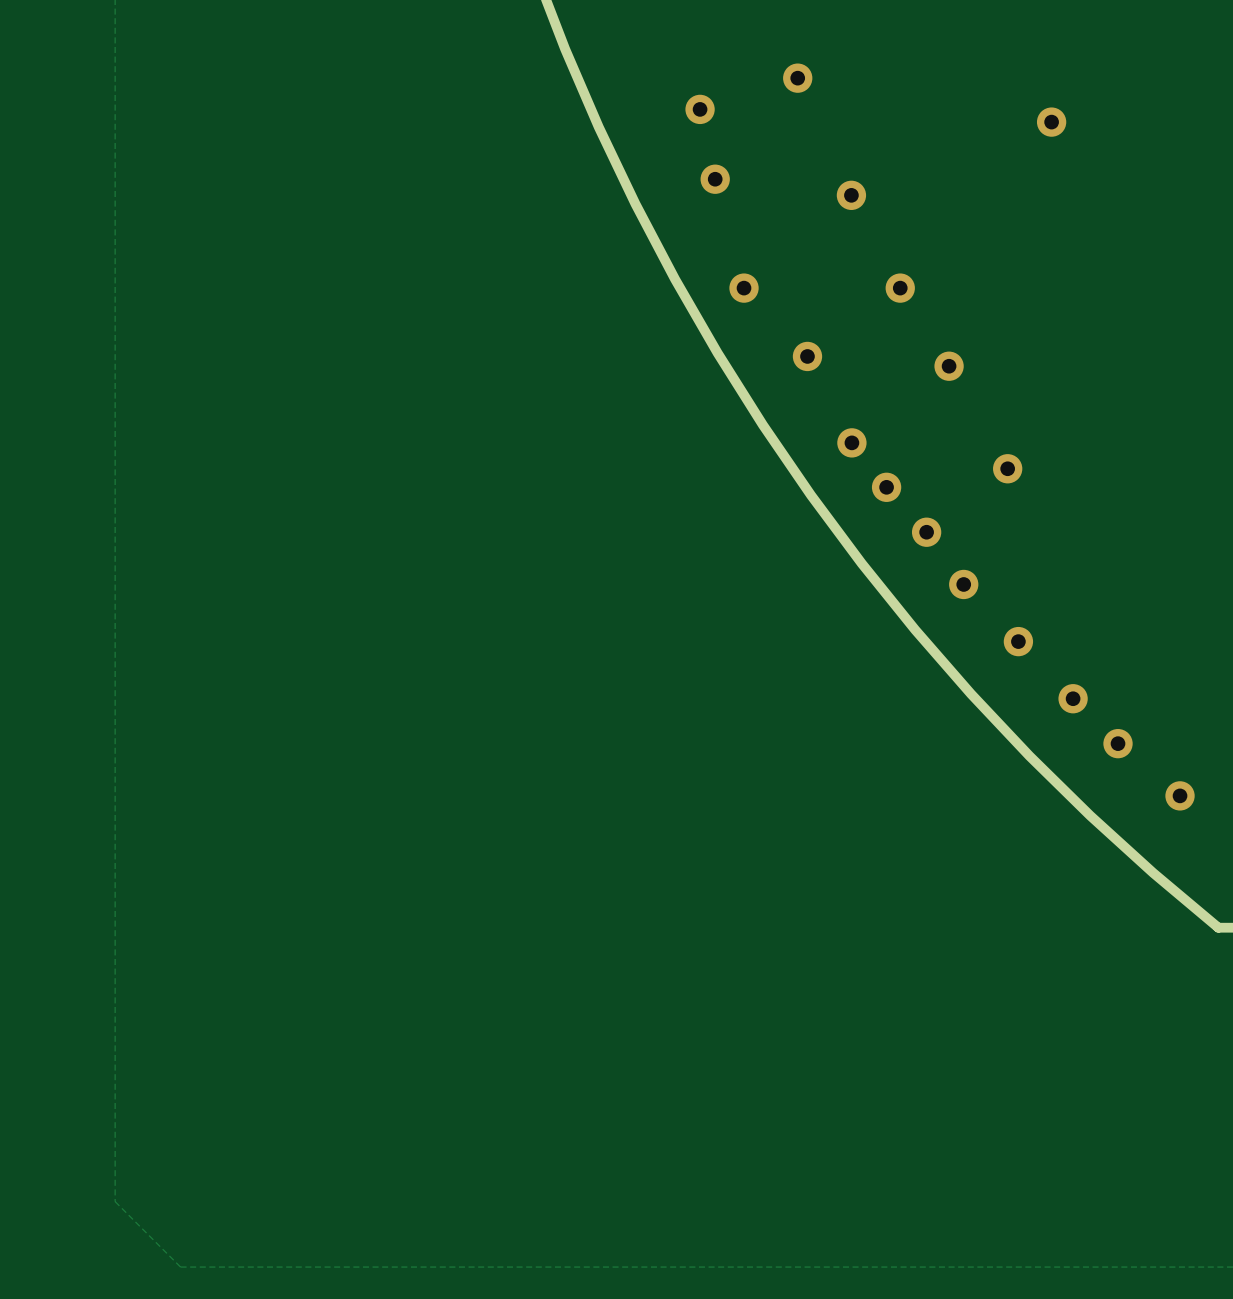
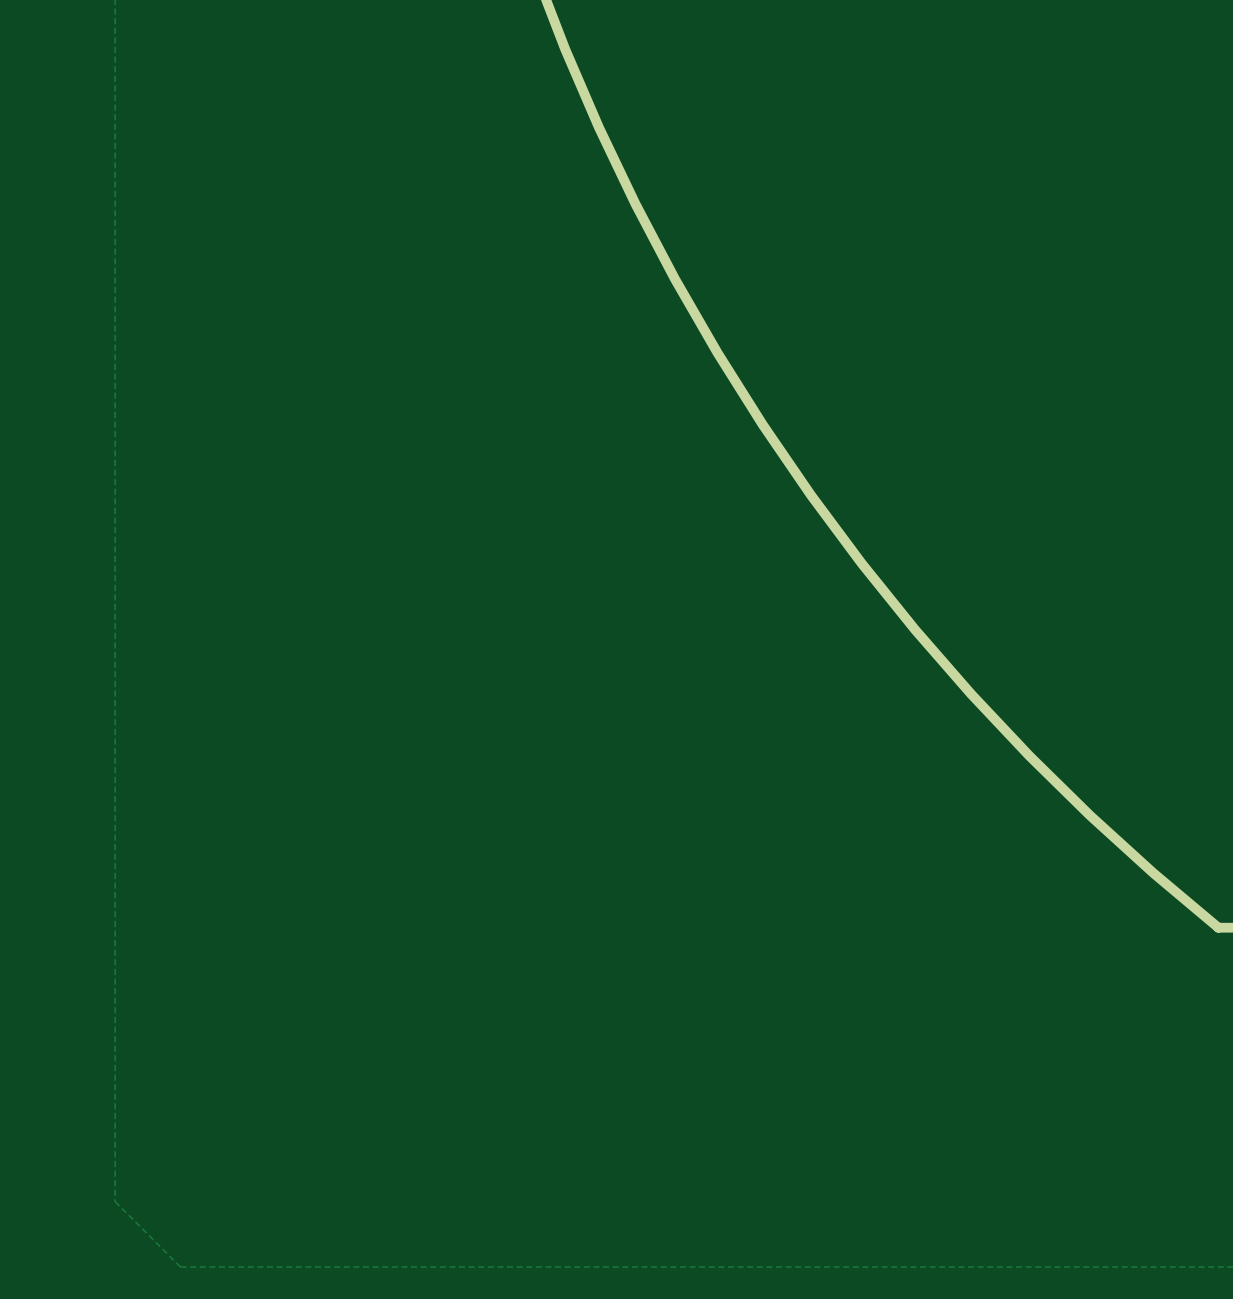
via: (797, 78) -> none
via: (700, 109) -> none
via: (1051, 122) -> none
via: (715, 179) -> none
via: (851, 195) -> none
via: (744, 288) -> none
via: (900, 288) -> none
via: (807, 356) -> none
via: (949, 366) -> none
via: (851, 442) -> none
via: (1007, 468) -> none
via: (886, 487) -> none
via: (926, 532) -> none
via: (963, 584) -> none
via: (1018, 641) -> none
via: (1073, 698) -> none
via: (1118, 743) -> none
via: (1180, 795) -> none

